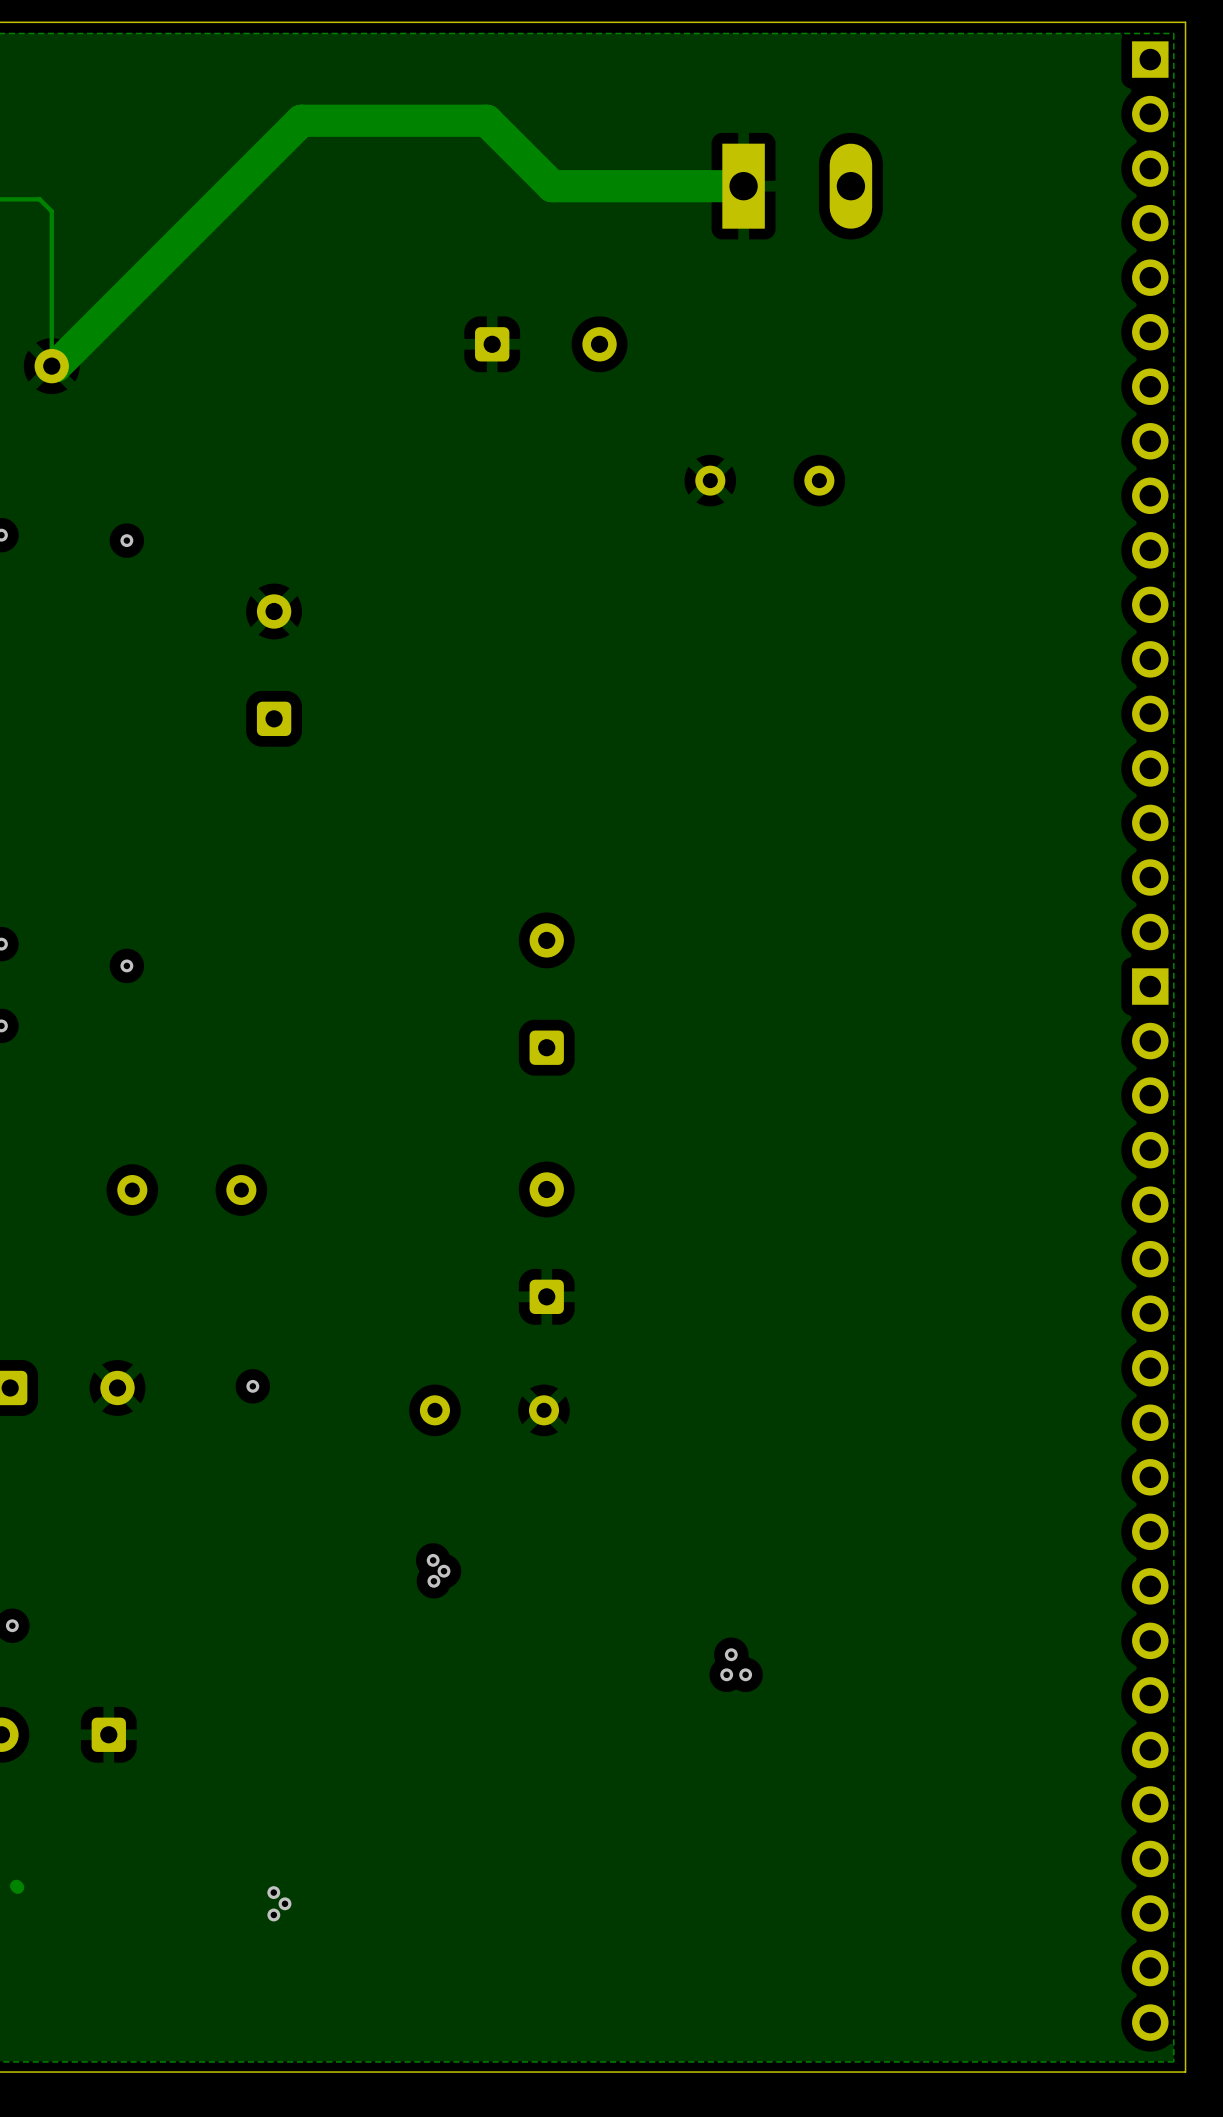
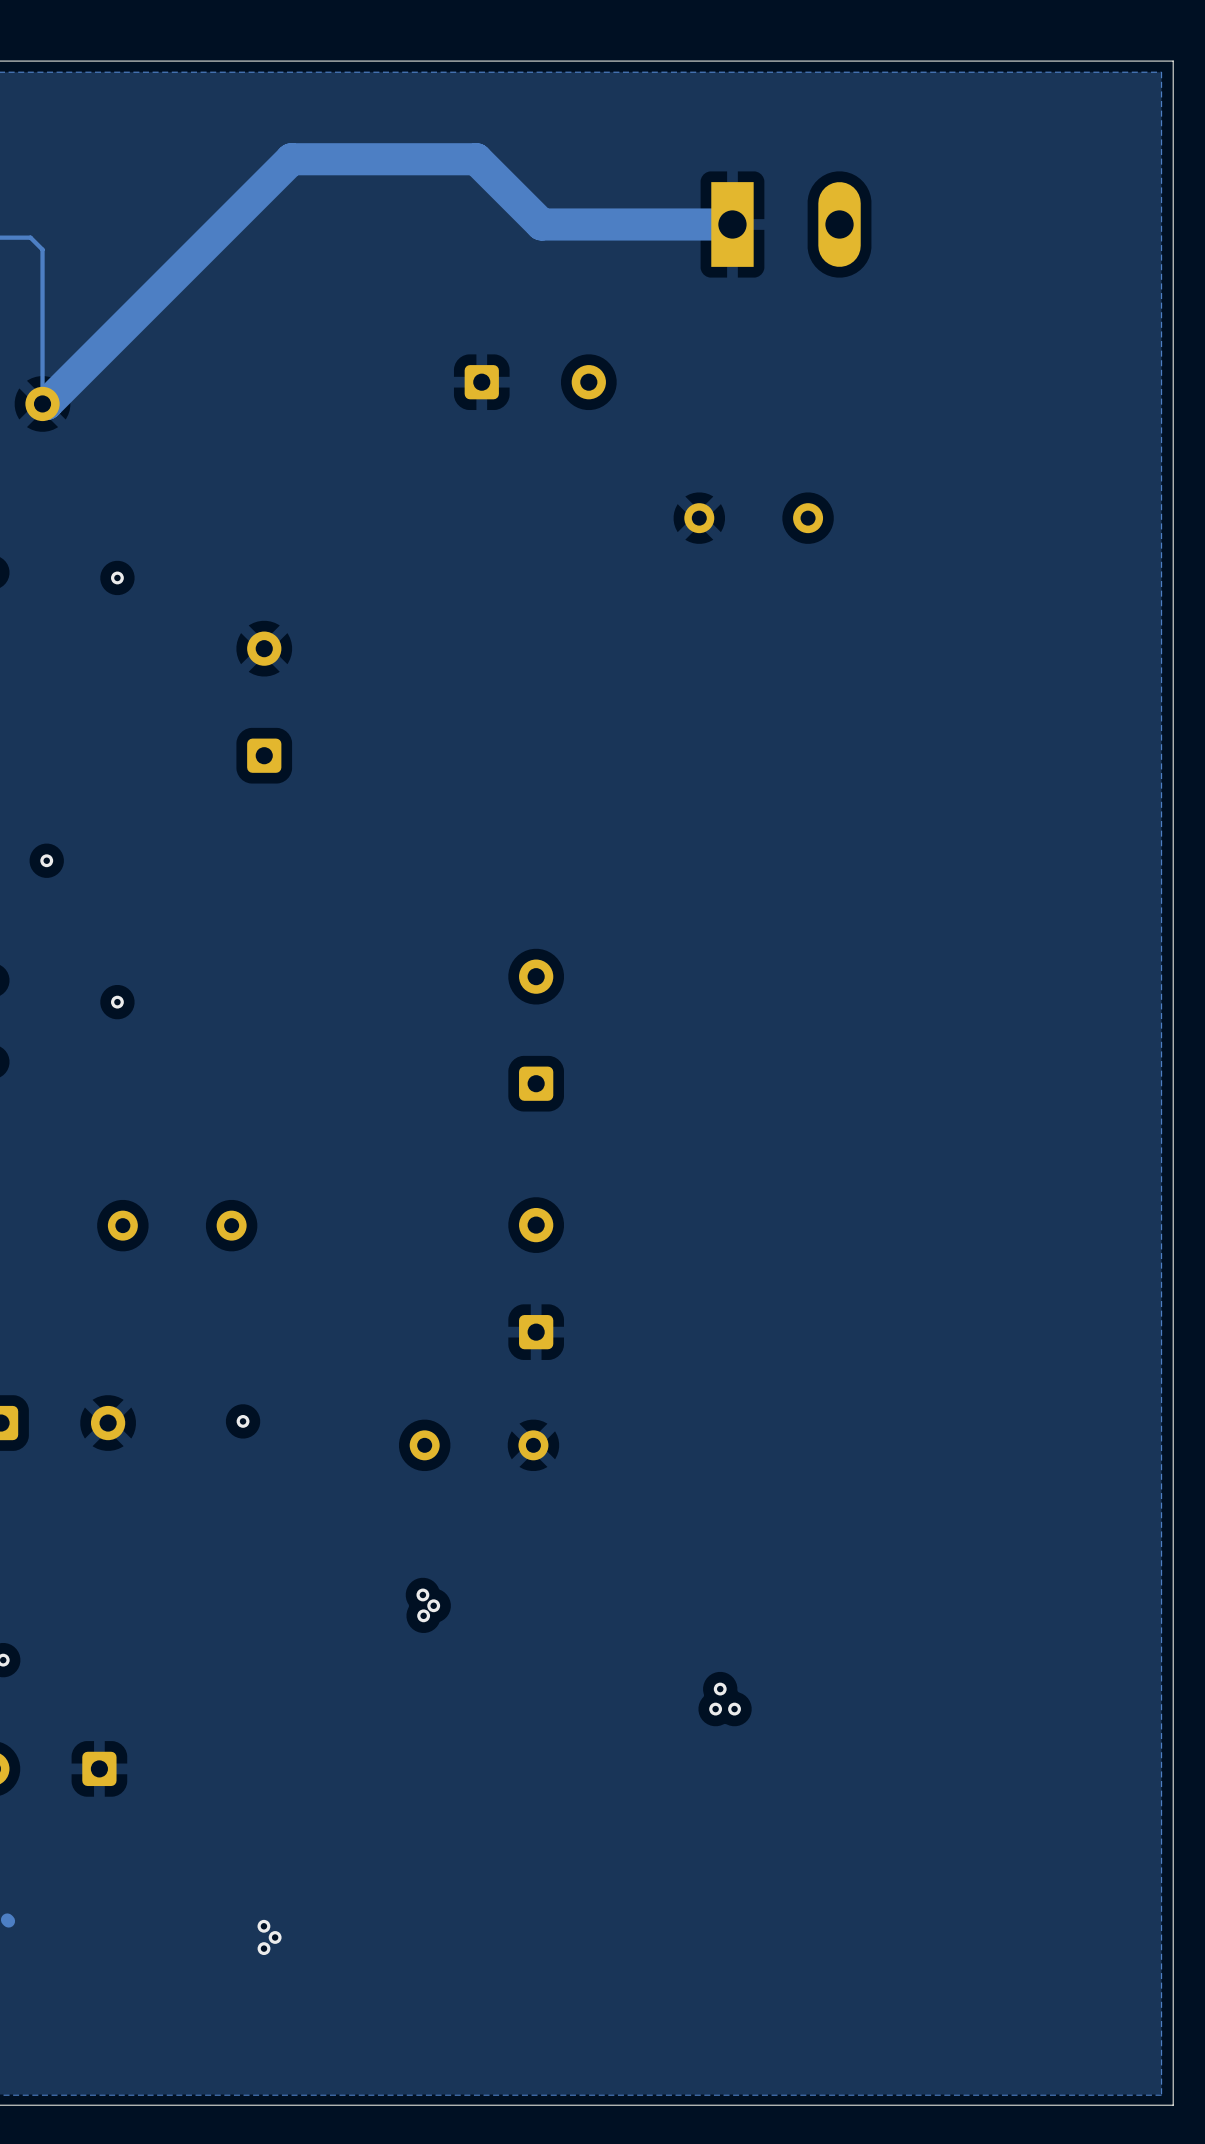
part: (1150, 495) -> none
via: none -> (46, 860)
part: (1150, 1504) -> none

